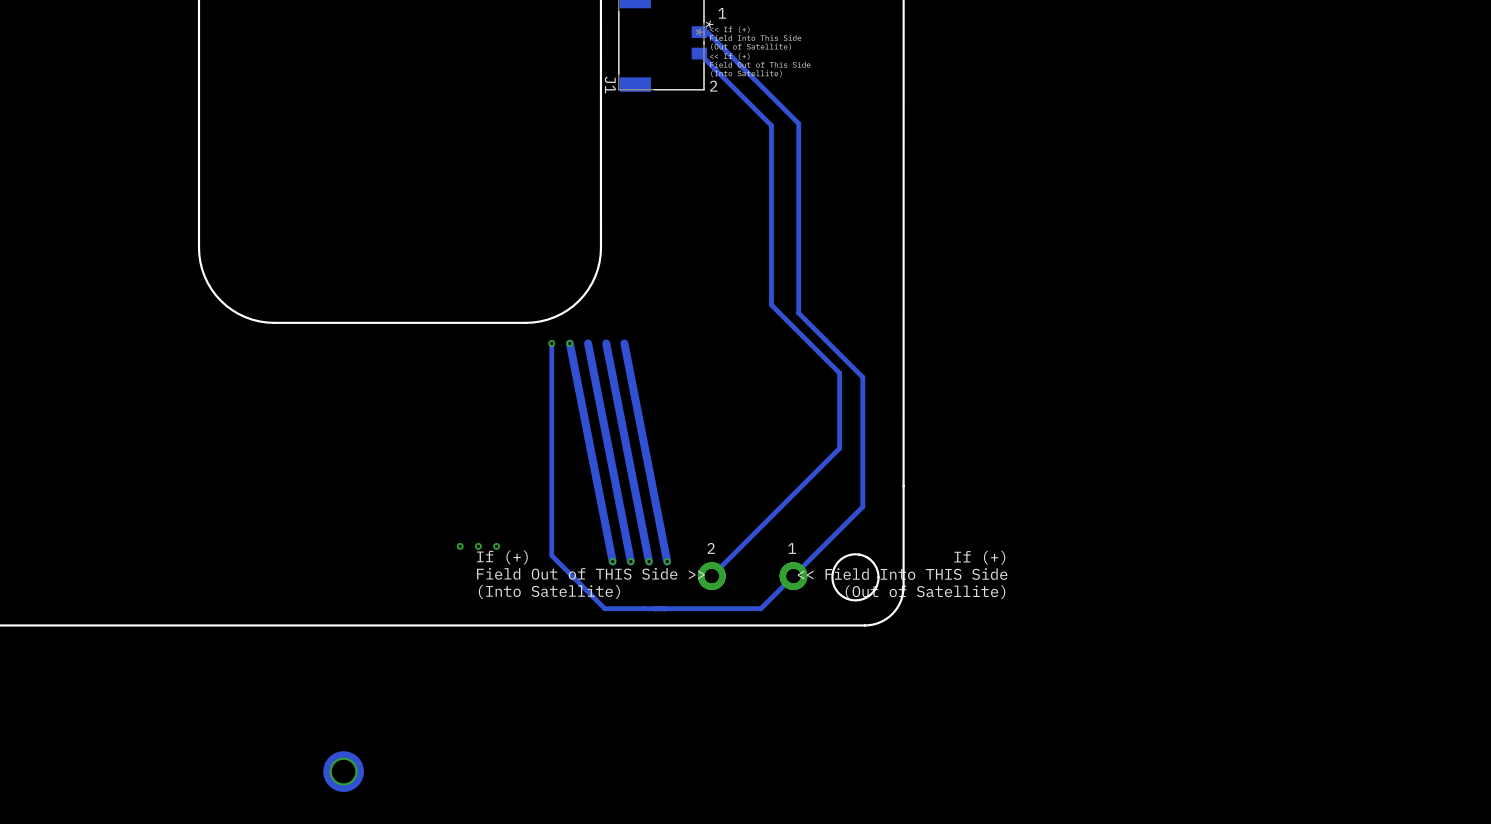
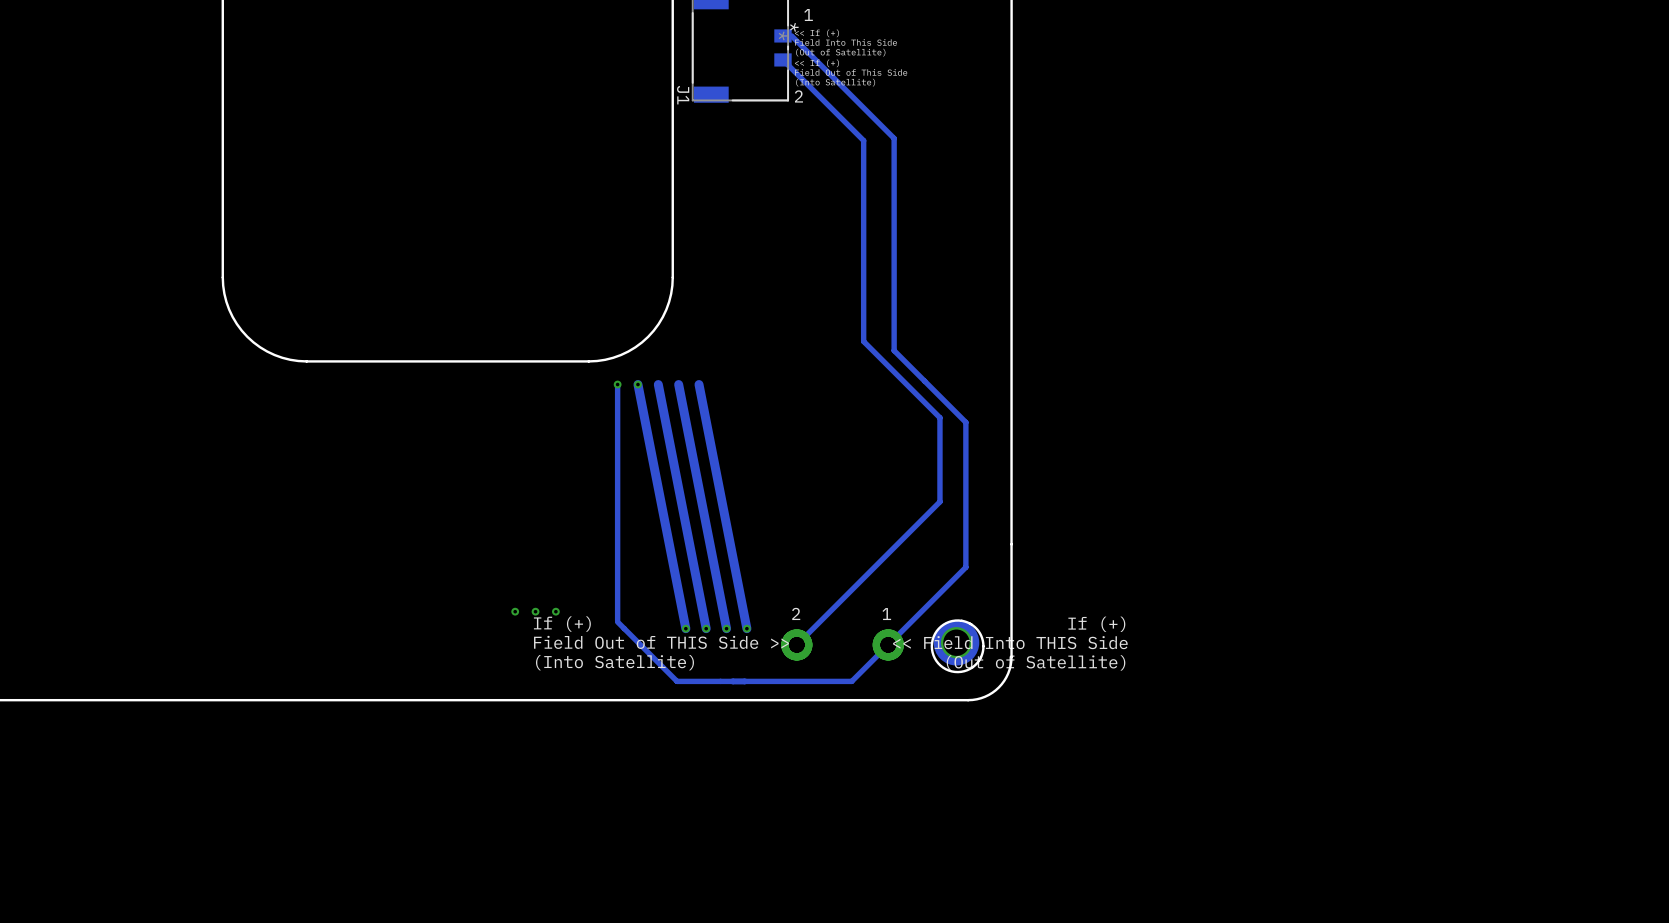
part: none -> (956, 642)
part: (343, 771) -> none

